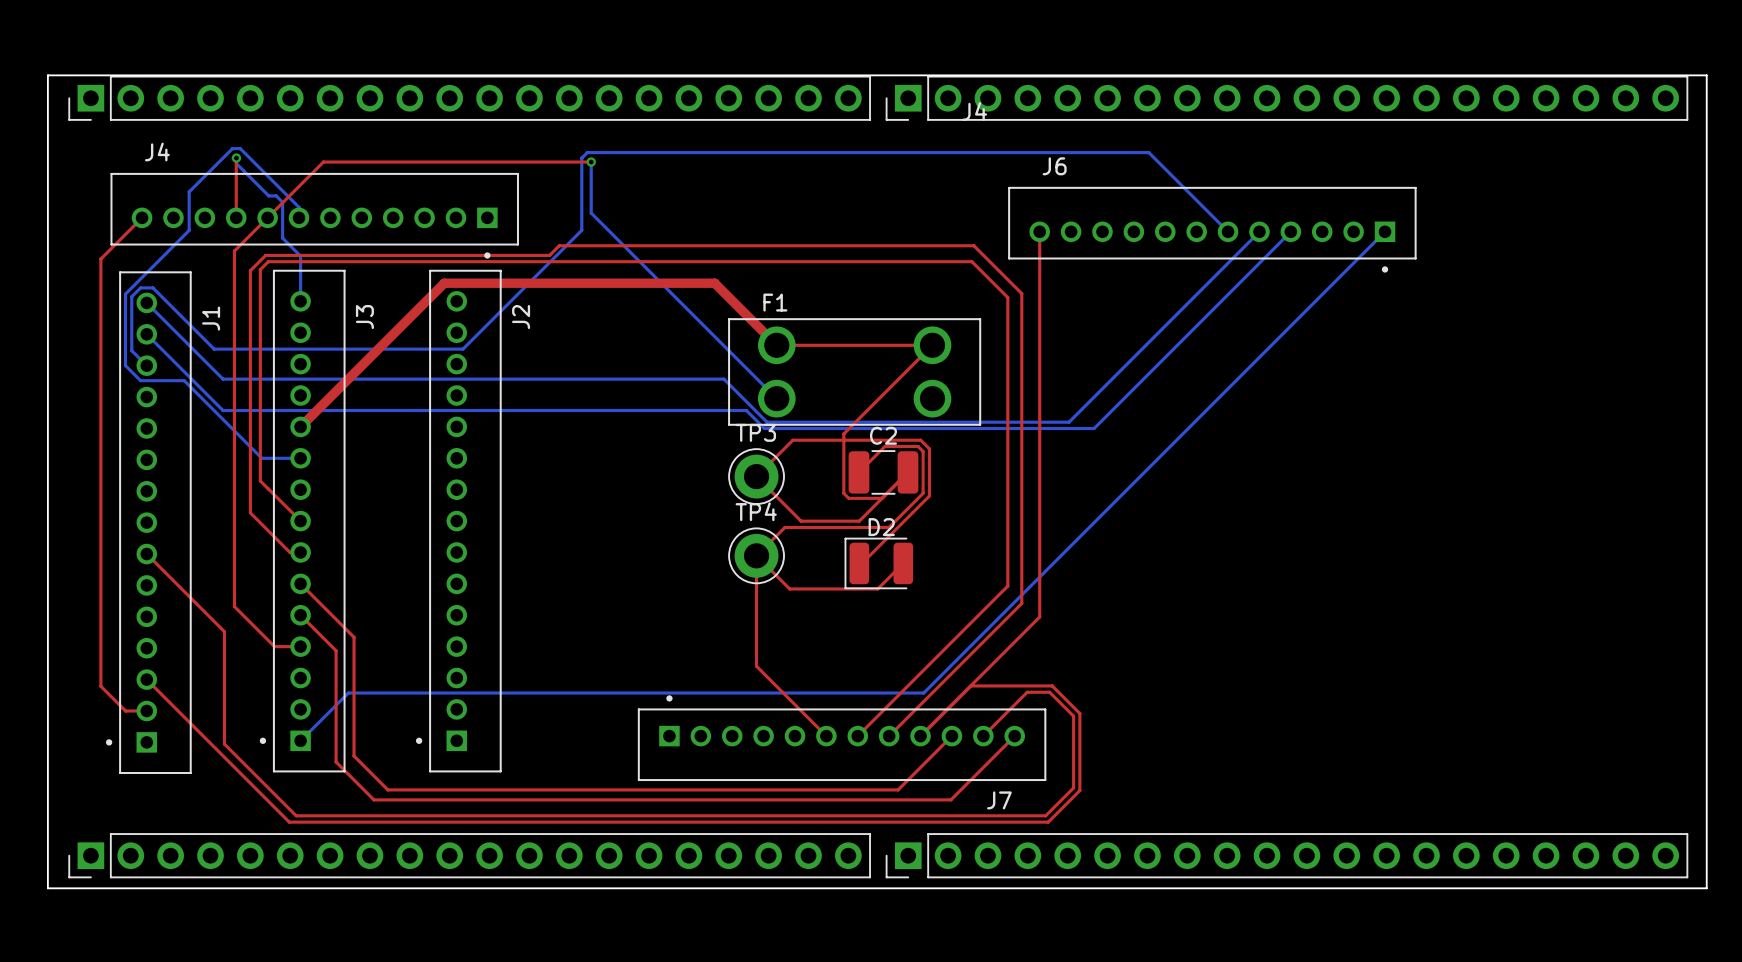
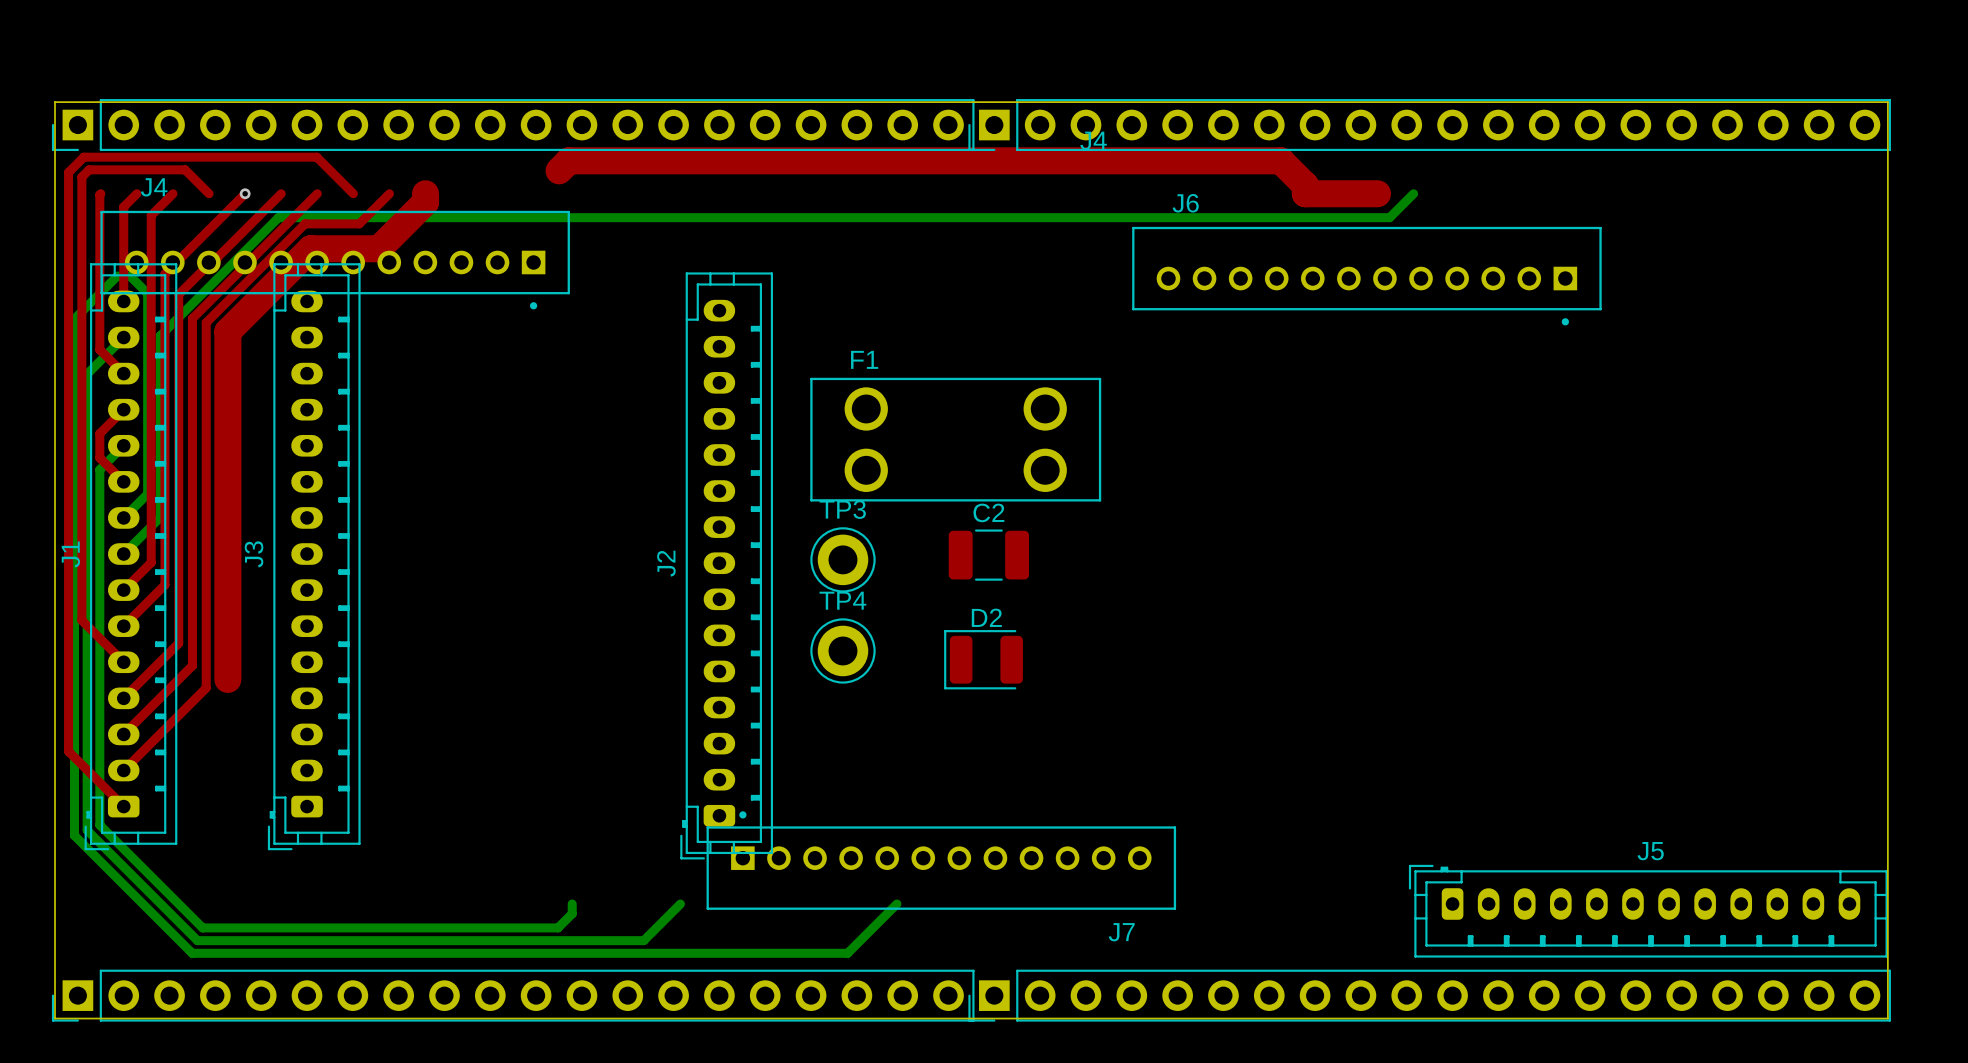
board edge: (47, 75) (1706, 75) (1706, 888) (47, 888) (47, 75) -> (55, 102) (55, 1018) (1887, 1018) (1887, 102) (55, 102)
part position: (1286, 98) -> (1429, 125)
top track: none -> (559, 170) (569, 160) (1280, 160) (1305, 185) (1305, 193) (1377, 193)
top track: none -> (100, 193) (99, 349) (123, 373)
top track: none -> (136, 193) (123, 206) (123, 301)
top track: none -> (172, 193) (151, 215) (151, 562) (123, 590)
top track: none -> (209, 193) (185, 169) (89, 169) (81, 177) (81, 620) (123, 662)
top track: (236, 158) (236, 217) -> (245, 193) (164, 273) (164, 584) (123, 626)
bottom track: (236, 158) (236, 163) (268, 195) (276, 195) (282, 202) (282, 238) (300, 256) (300, 301) -> none
top track: none -> (281, 193) (178, 294) (178, 643) (123, 698)
top track: none -> (317, 193) (192, 318) (192, 665) (123, 734)
top track: none -> (353, 193) (316, 157) (83, 157) (68, 172) (68, 751) (123, 806)
top track: none -> (389, 193) (359, 223) (305, 223) (206, 322) (206, 688) (123, 770)
top track: none -> (425, 193) (425, 202) (379, 248) (310, 248) (227, 331) (227, 679)
bottom track: none -> (1413, 193) (1389, 217) (278, 217) (160, 335) (160, 517) (123, 554)
bottom track: (591, 162) (591, 213) (776, 398) -> none
via: (591, 162) -> none
top track: (593, 162) (323, 162) (234, 251) (234, 606) (274, 646) (300, 646) -> none
top track: (142, 217) (100, 259) (100, 686) (125, 710) (146, 710) -> none
bottom track: (299, 217) (299, 207) (240, 148) (232, 148) (189, 191) (189, 230) (125, 294) (125, 365) (140, 380) (184, 380) (261, 458) (300, 458) -> none
top track: (1039, 231) (1039, 616) (920, 736) -> none
bottom track: (1228, 231) (1148, 152) (587, 152) (581, 158) (581, 230) (462, 349) (214, 349) (152, 287) (140, 287) (131, 296) (131, 350) (146, 365) -> none
bottom track: (1259, 231) (1069, 422) (767, 422) (723, 379) (222, 379) (146, 302) -> none
bottom track: (1290, 231) (1094, 428) (764, 428) (746, 410) (222, 410) (146, 334) -> none
bottom track: (1385, 231) (923, 693) (348, 693) (300, 740) -> none
J3 footprint: [259, 269, 346, 773] -> [267, 263, 361, 851]
J2 footprint: [415, 269, 502, 773] -> [680, 272, 774, 860]
J1 footprint: [105, 271, 192, 774] -> [84, 263, 178, 851]
bottom track: none -> (123, 337) (87, 374) (87, 830) (197, 940) (643, 940) (680, 903)
J3 name position: J3 (364, 317) -> J3 (254, 554)
J2 name position: J2 (521, 317) -> J2 (666, 563)
J1 name position: J1 (211, 318) -> J1 (70, 554)
top track: none -> (123, 409) (99, 433) (99, 457) (123, 481)
bottom track: none -> (123, 445) (99, 469) (99, 825) (202, 927) (558, 927) (572, 913) (572, 903)
top track: (300, 426) (444, 283) (714, 283) (776, 345) (932, 345) (843, 433) (843, 493) (848, 498) (882, 498) -> none
bottom track: none -> (123, 517) (147, 494) (147, 293) (130, 276) (117, 276) (74, 318) (74, 835) (192, 953) (847, 953) (896, 903)
top track: (858, 472) (884, 446) (918, 446) (923, 451) (923, 493) (889, 527) (784, 527) (756, 555) -> none
top track: (908, 472) (859, 521) (801, 521) (756, 476) (792, 440) (920, 440) (929, 448) (929, 495) (861, 563) (859, 563) -> none
top track: (268, 488) (260, 480) (260, 269) (268, 261) (971, 261) (1007, 297) (1007, 586) (857, 736) -> none
top track: (268, 488) (300, 521) -> none
top track: (300, 552) (289, 552) (250, 512) (250, 270) (265, 255) (549, 255) (559, 245) (973, 245) (1021, 293) (1021, 603) (889, 736) -> none
top track: (146, 554) (224, 631) (224, 744) (296, 815) (1045, 815) (1073, 787) (1073, 716) (1049, 692) (1027, 692) (983, 736) -> none
top track: (756, 555) (756, 666) (826, 736) -> none
top track: (756, 555) (789, 588) (877, 588) (903, 563) -> none
top track: (300, 583) (354, 637) (354, 756) (387, 789) (898, 789) (951, 736) -> none
top track: (300, 615) (336, 650) (336, 762) (373, 799) (950, 799) (1014, 736) -> none
top track: (146, 679) (289, 822) (1048, 822) (1079, 790) (1079, 713) (1052, 685) (970, 685) -> none
J5: none -> (1648, 911)
part position: (1286, 855) -> (1429, 995)

